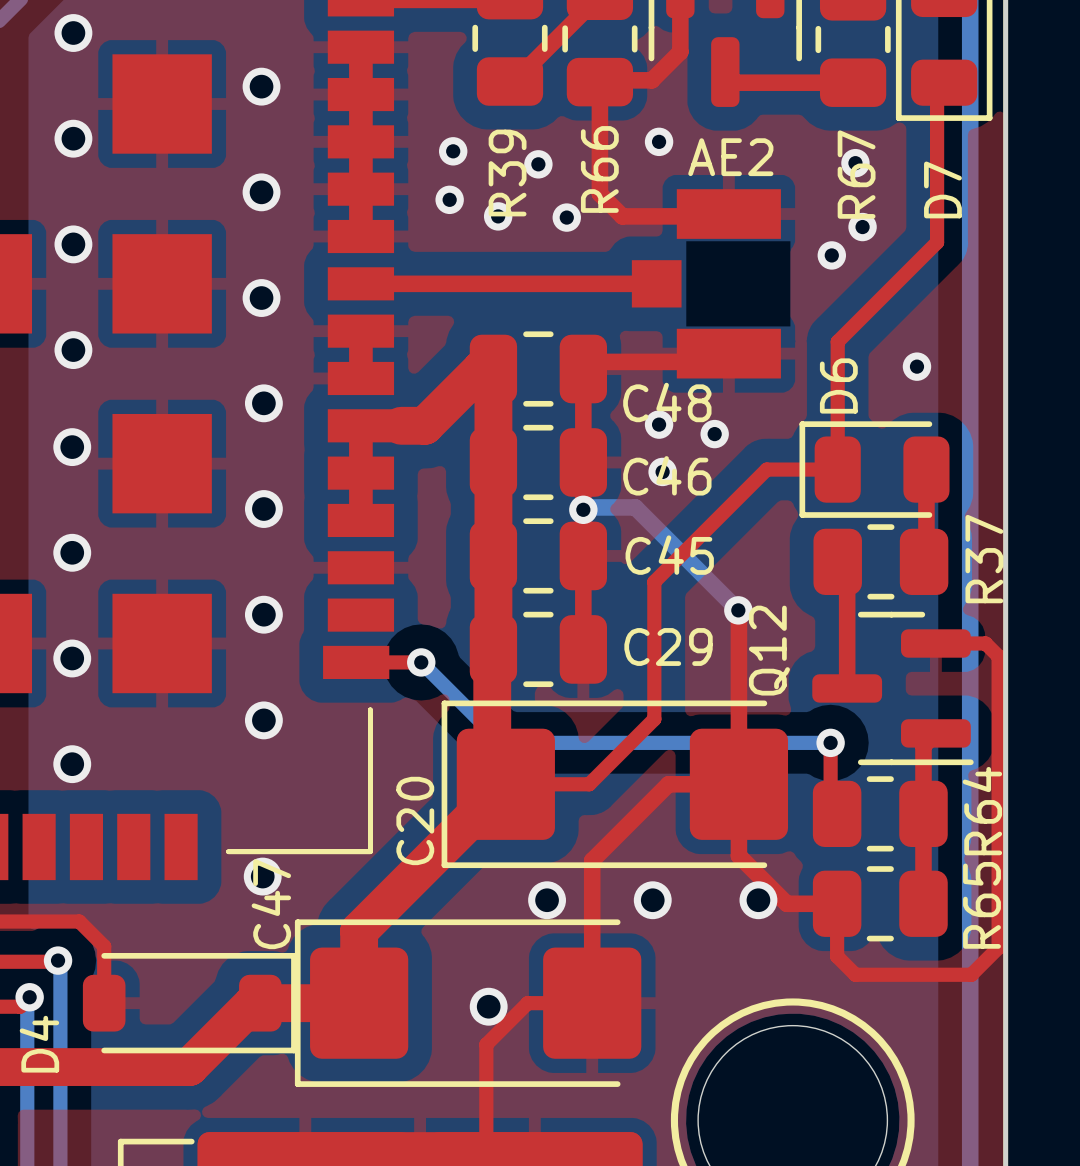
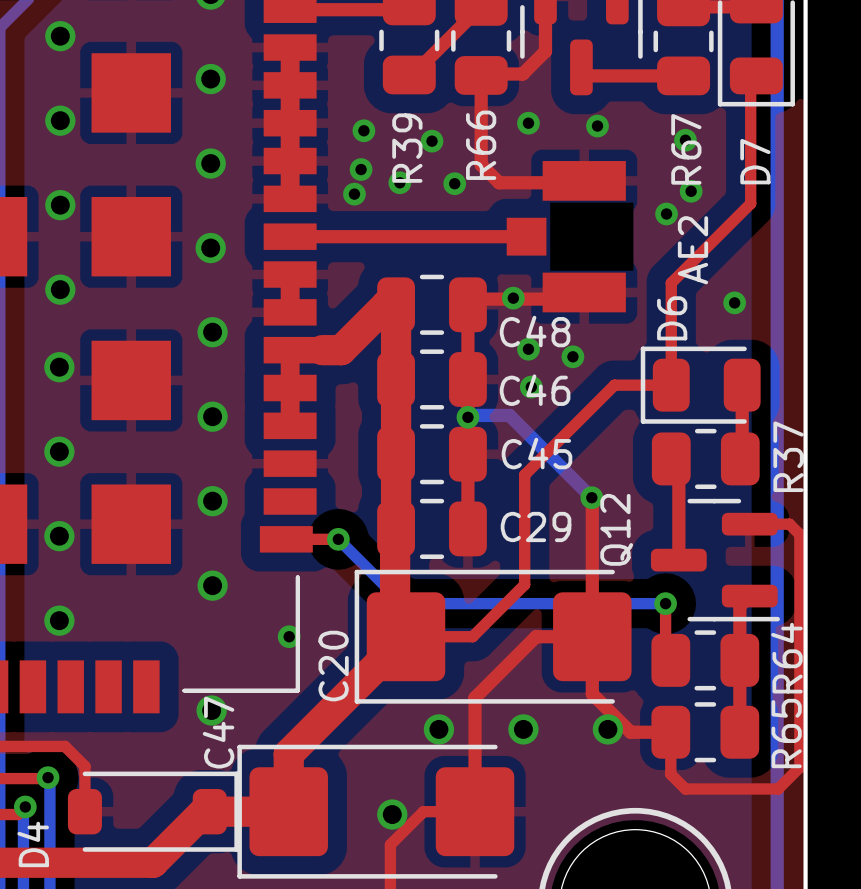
via: none -> (597, 126)
AE2 name rotation: 0° (730, 157) -> 90° counterclockwise (692, 250)
AE2 name position: AE2 (730, 157) -> AE2 (692, 250)
via: none -> (354, 194)
via: none -> (513, 298)
via: none -> (289, 636)

